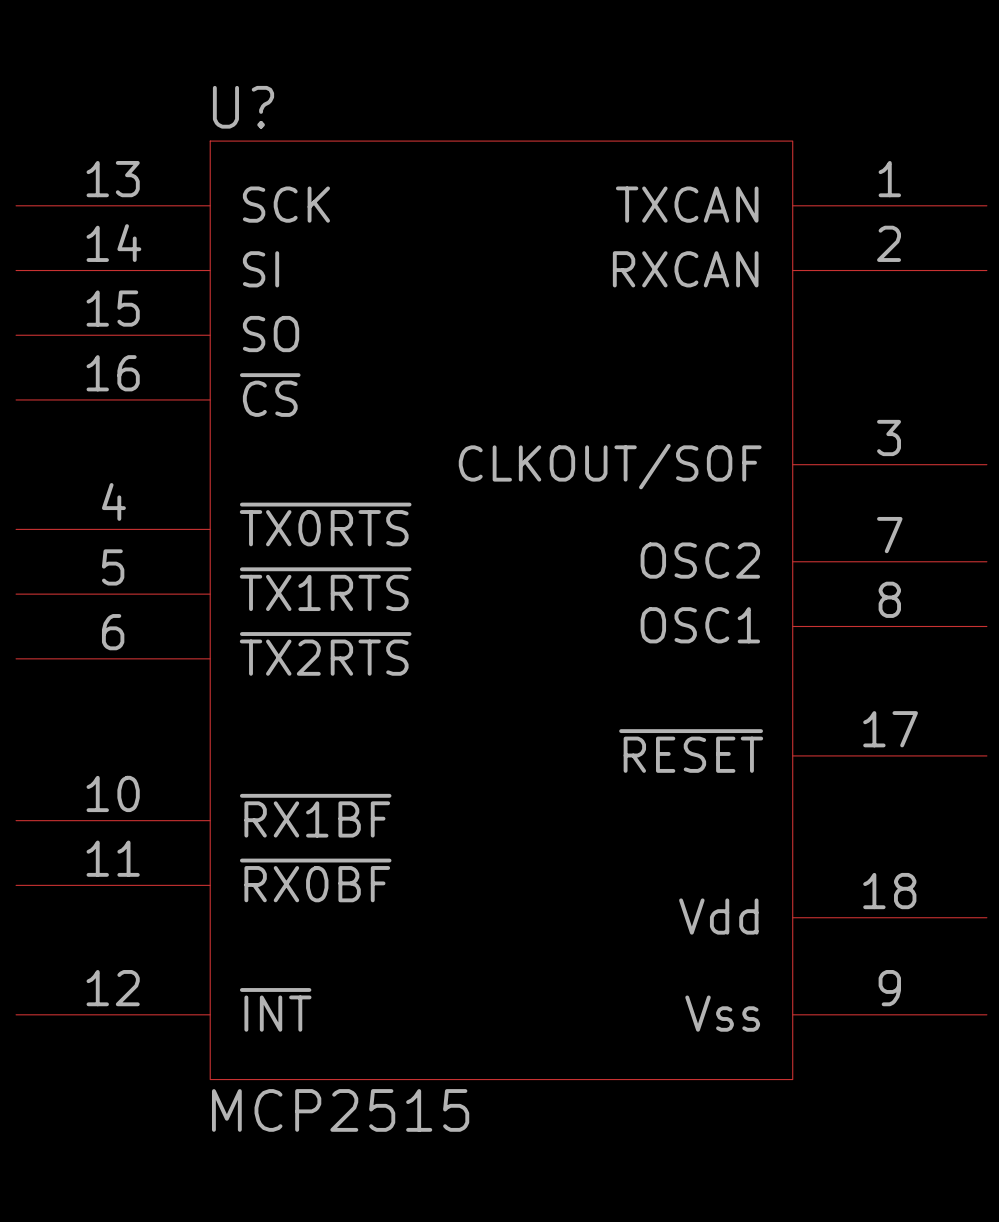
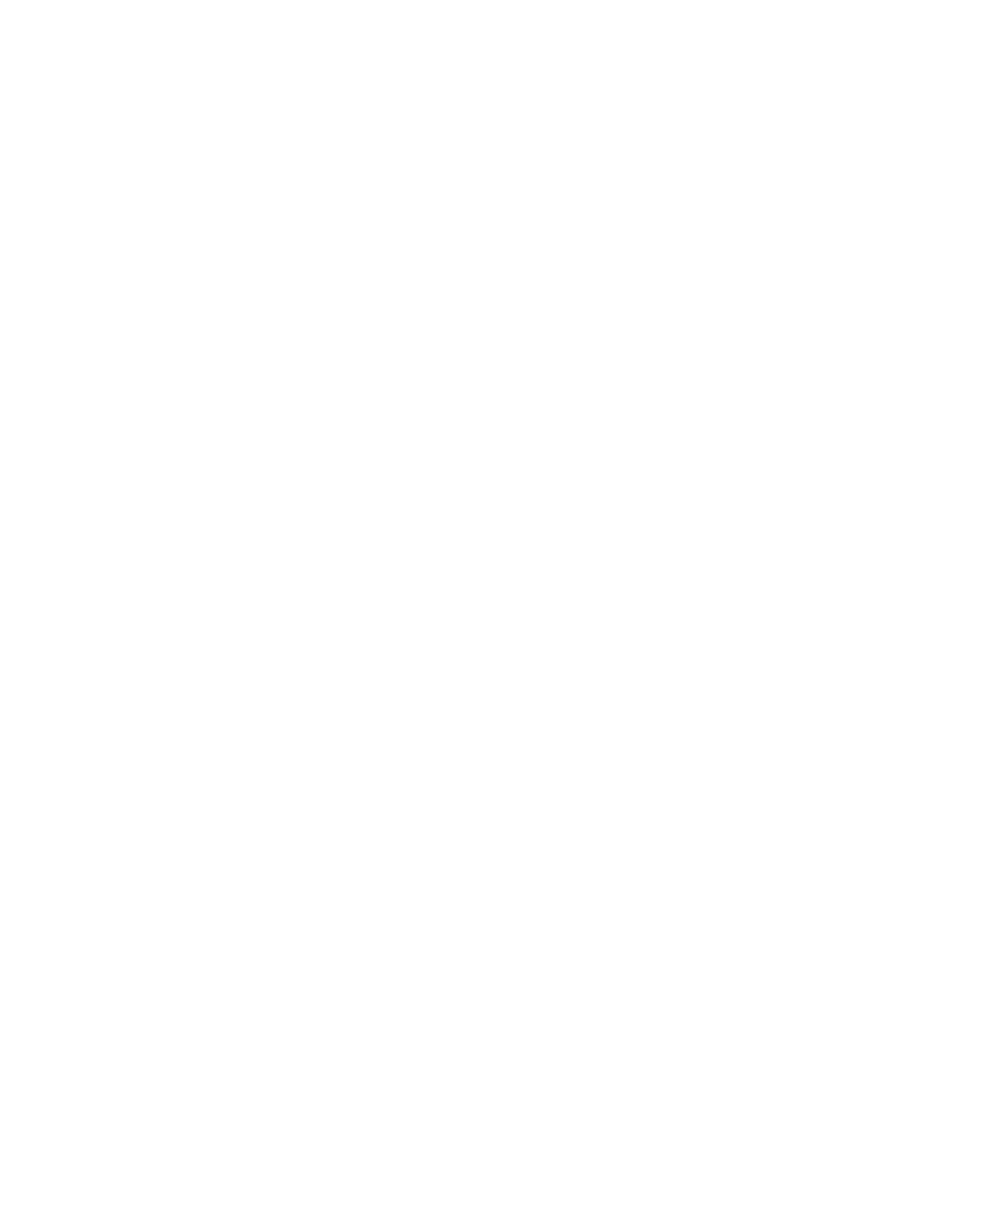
U?: MCP2515 (501, 610) -> none

